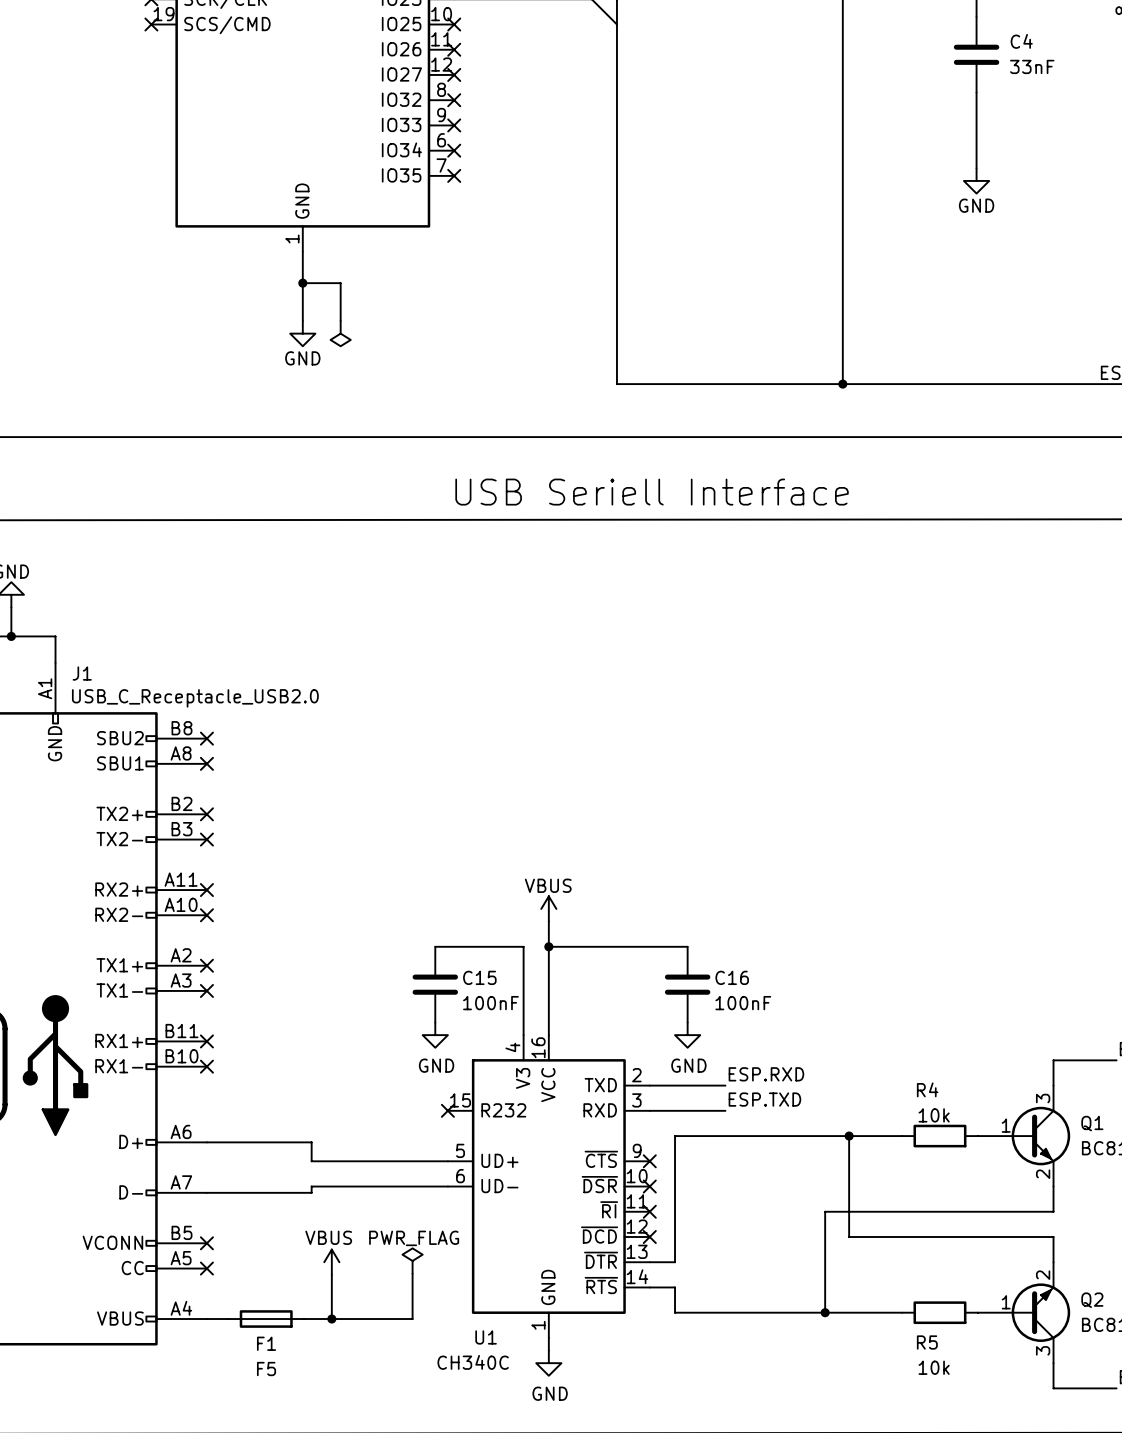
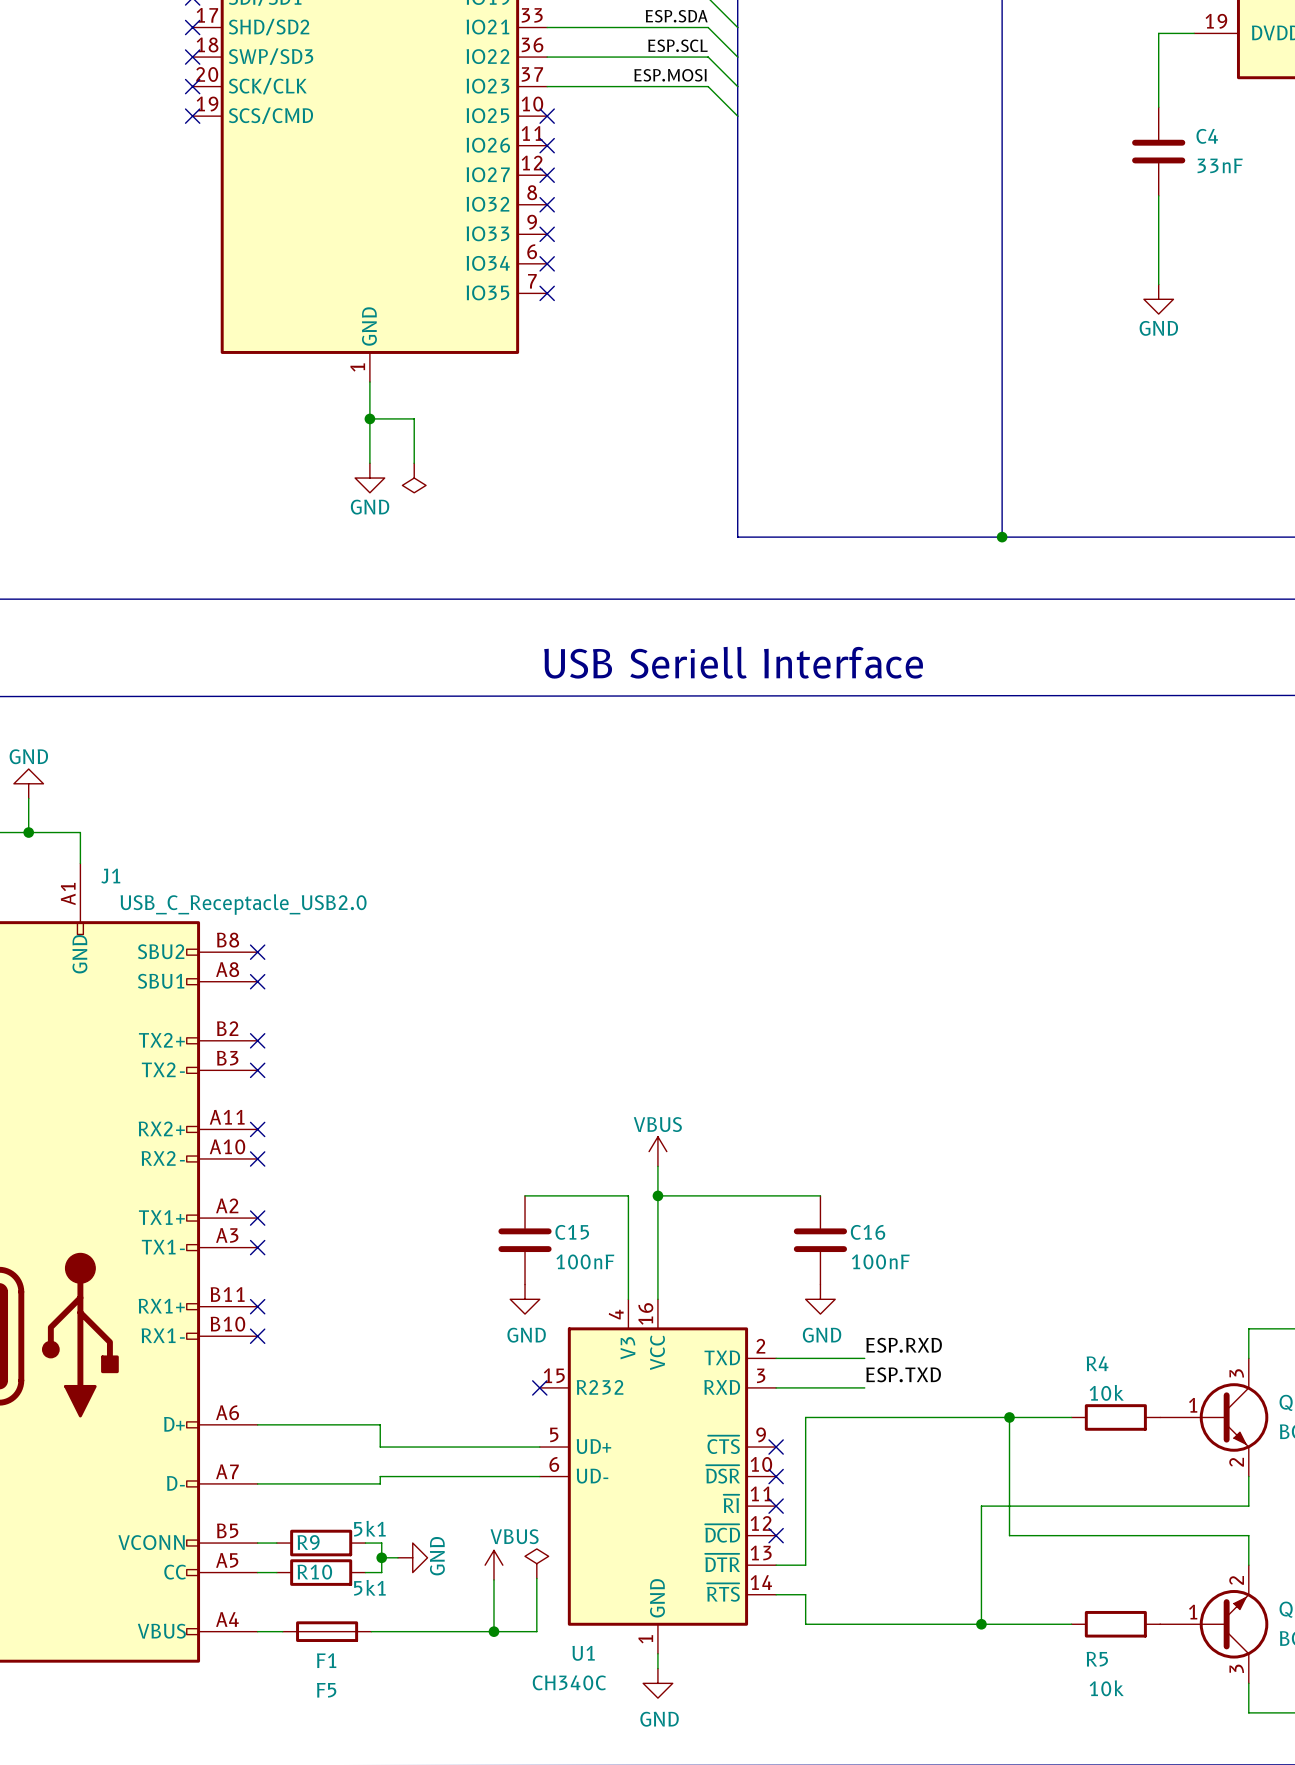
wire: none -> (257, 1543) (276, 1543)
no-connect mark: (206, 1243) -> none
R9: none -> 5k1 (321, 1543)
wire: none -> (365, 1543) (381, 1543) (381, 1572) (365, 1572)
wire: none -> (381, 1557) (397, 1557)
junction: none -> (381, 1557)
power symbol: PWR_FLAG (412, 1260) -> VBUS (493, 1565)
power symbol: none -> (536, 1563)
power symbol: VBUS (331, 1262) -> GND (412, 1557)
wire: none -> (257, 1572) (276, 1572)
no-connect mark: (206, 1268) -> none
R10: none -> 5k1 (321, 1572)
wire: (412, 1273) (412, 1319) -> (536, 1578) (536, 1631) (498, 1631)
wire: (331, 1274) (331, 1319) -> (493, 1579) (493, 1631)
junction: (331, 1319) -> none
junction: none -> (493, 1631)

